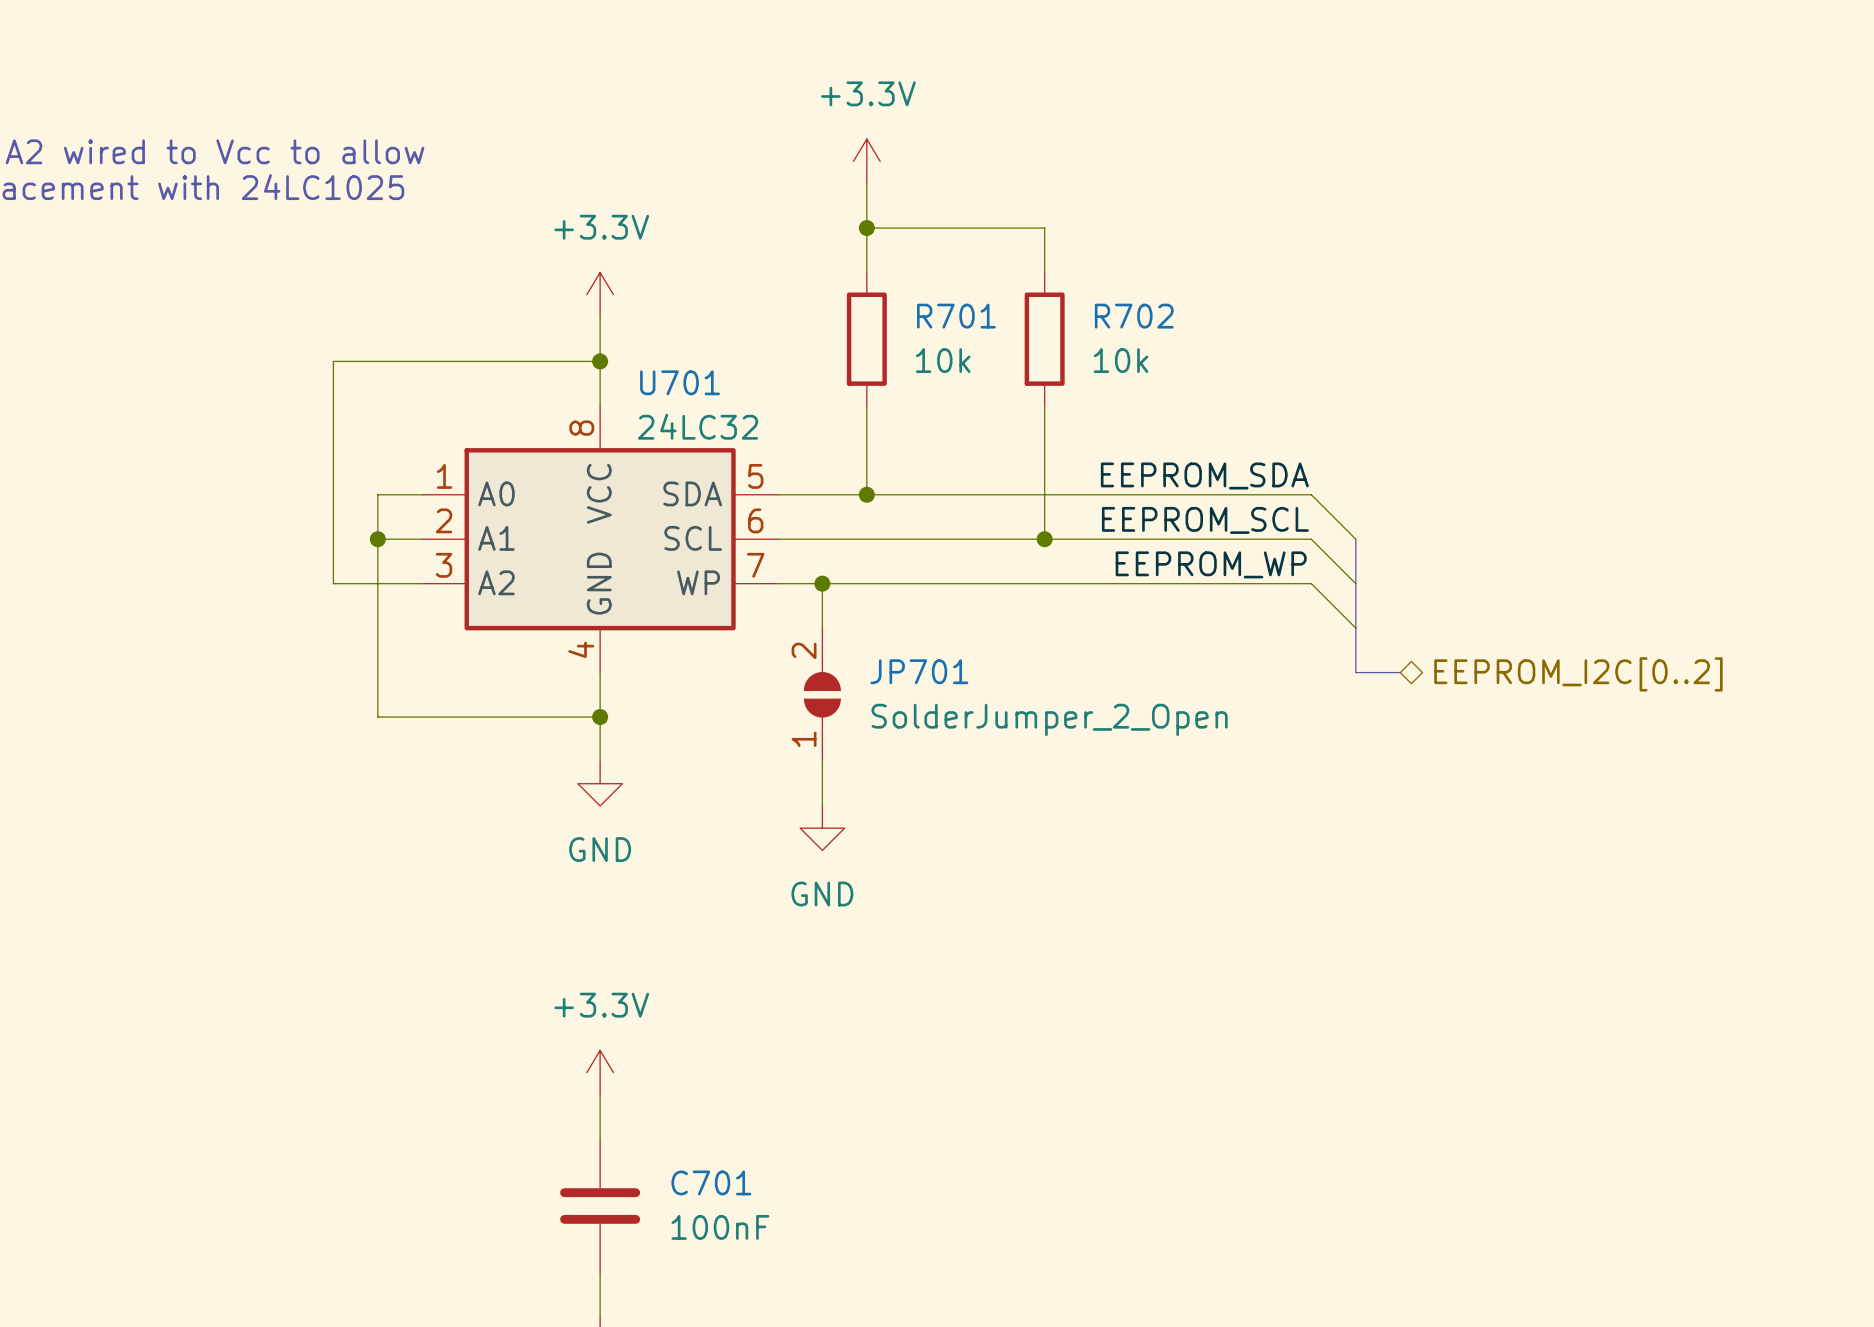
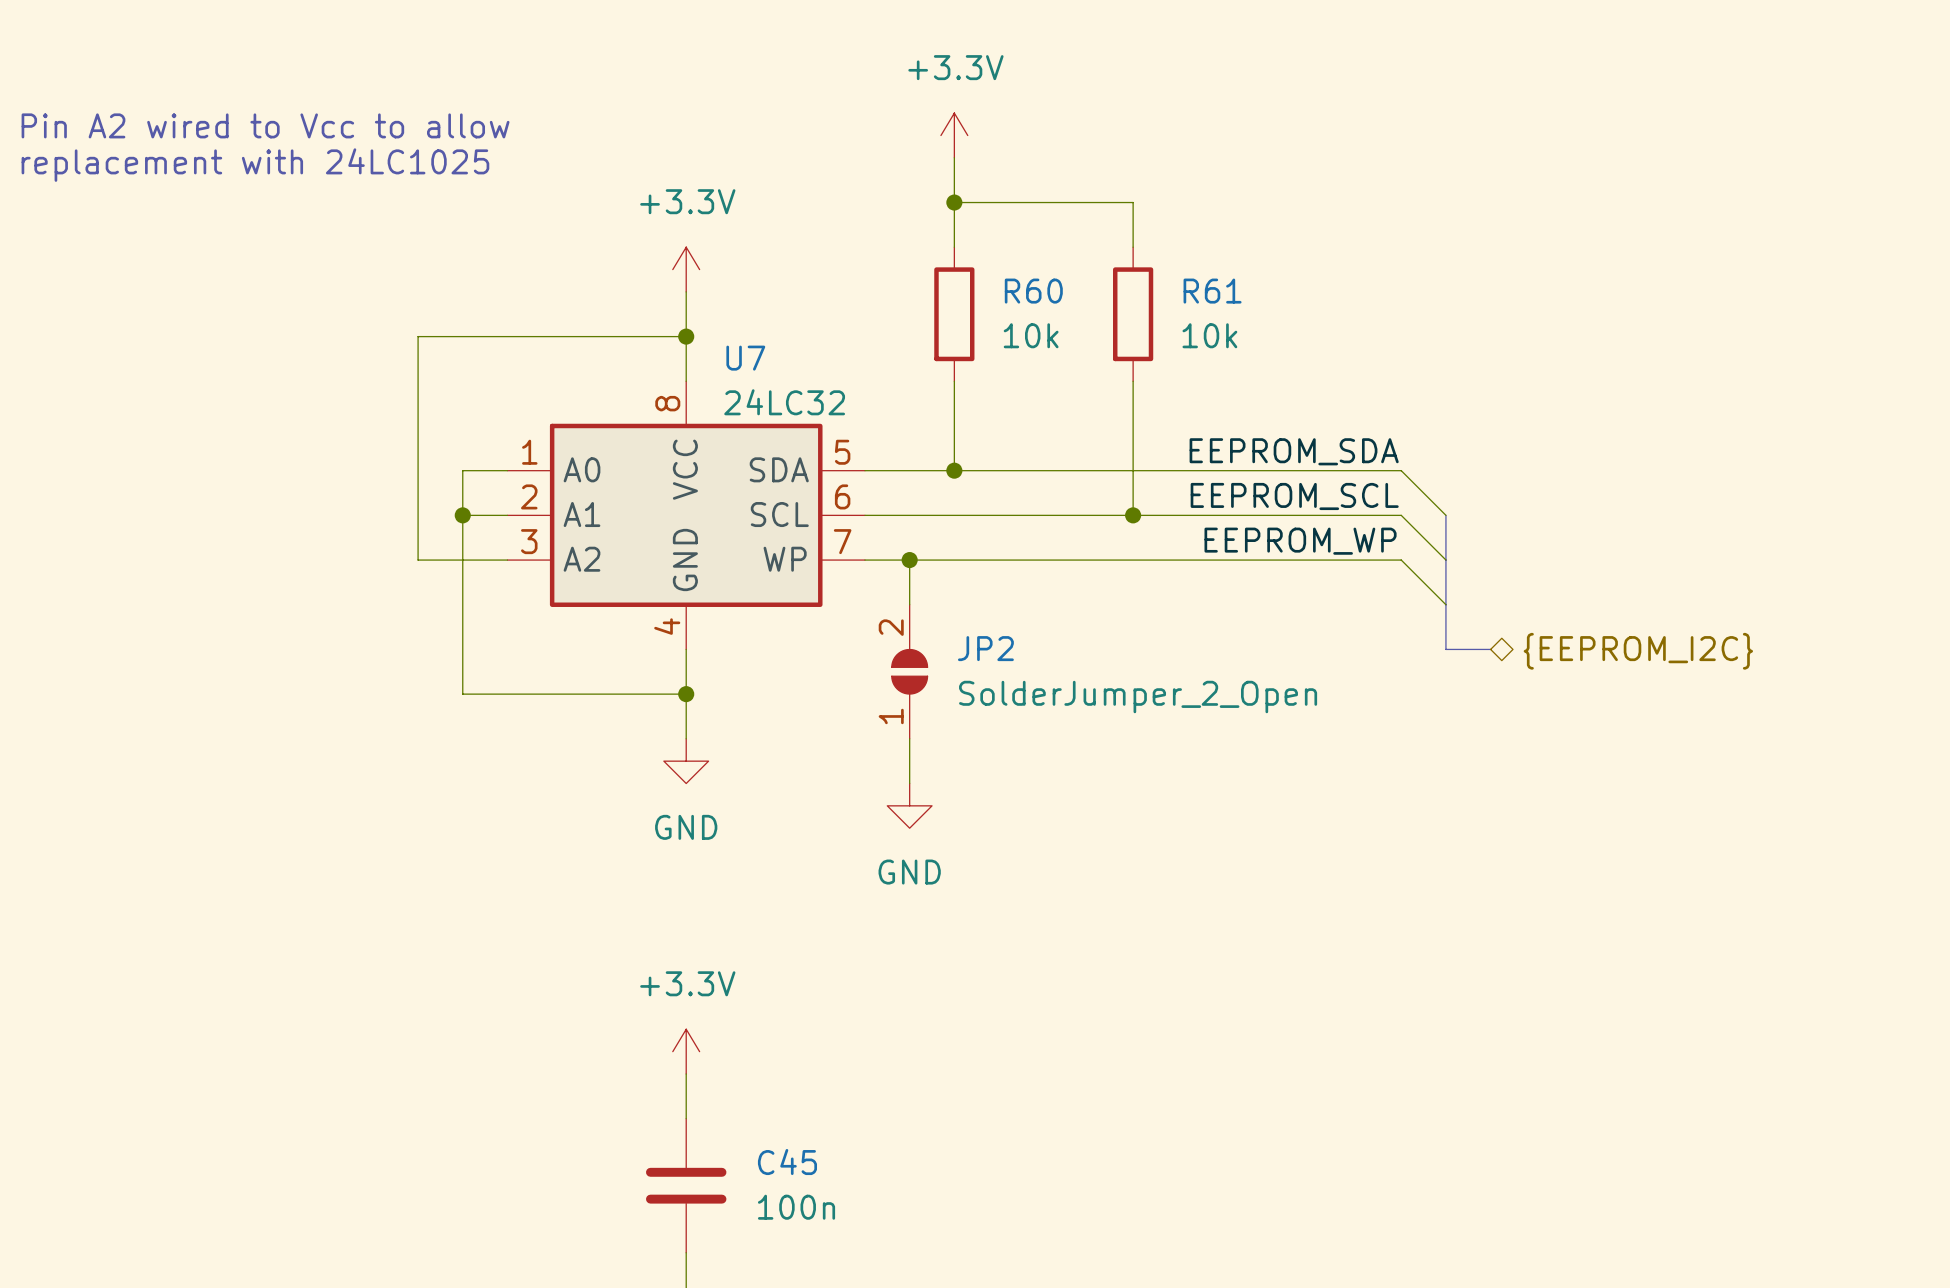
R701 name: R701 (956, 316) -> R60 (1033, 291)
R702 name: R702 (1134, 316) -> R61 (1212, 291)
U701 name: U701 (680, 382) -> U7 (745, 358)
JP701 name: JP701 (919, 671) -> JP2 (985, 648)
hierarchical label: EEPROM_I2C[0..2] (1578, 674) -> {EEPROM_I2C} (1638, 651)
C701 name: C701 (711, 1182) -> C45 (787, 1162)
C701 value: 100nF (720, 1227) -> 100n (796, 1207)

